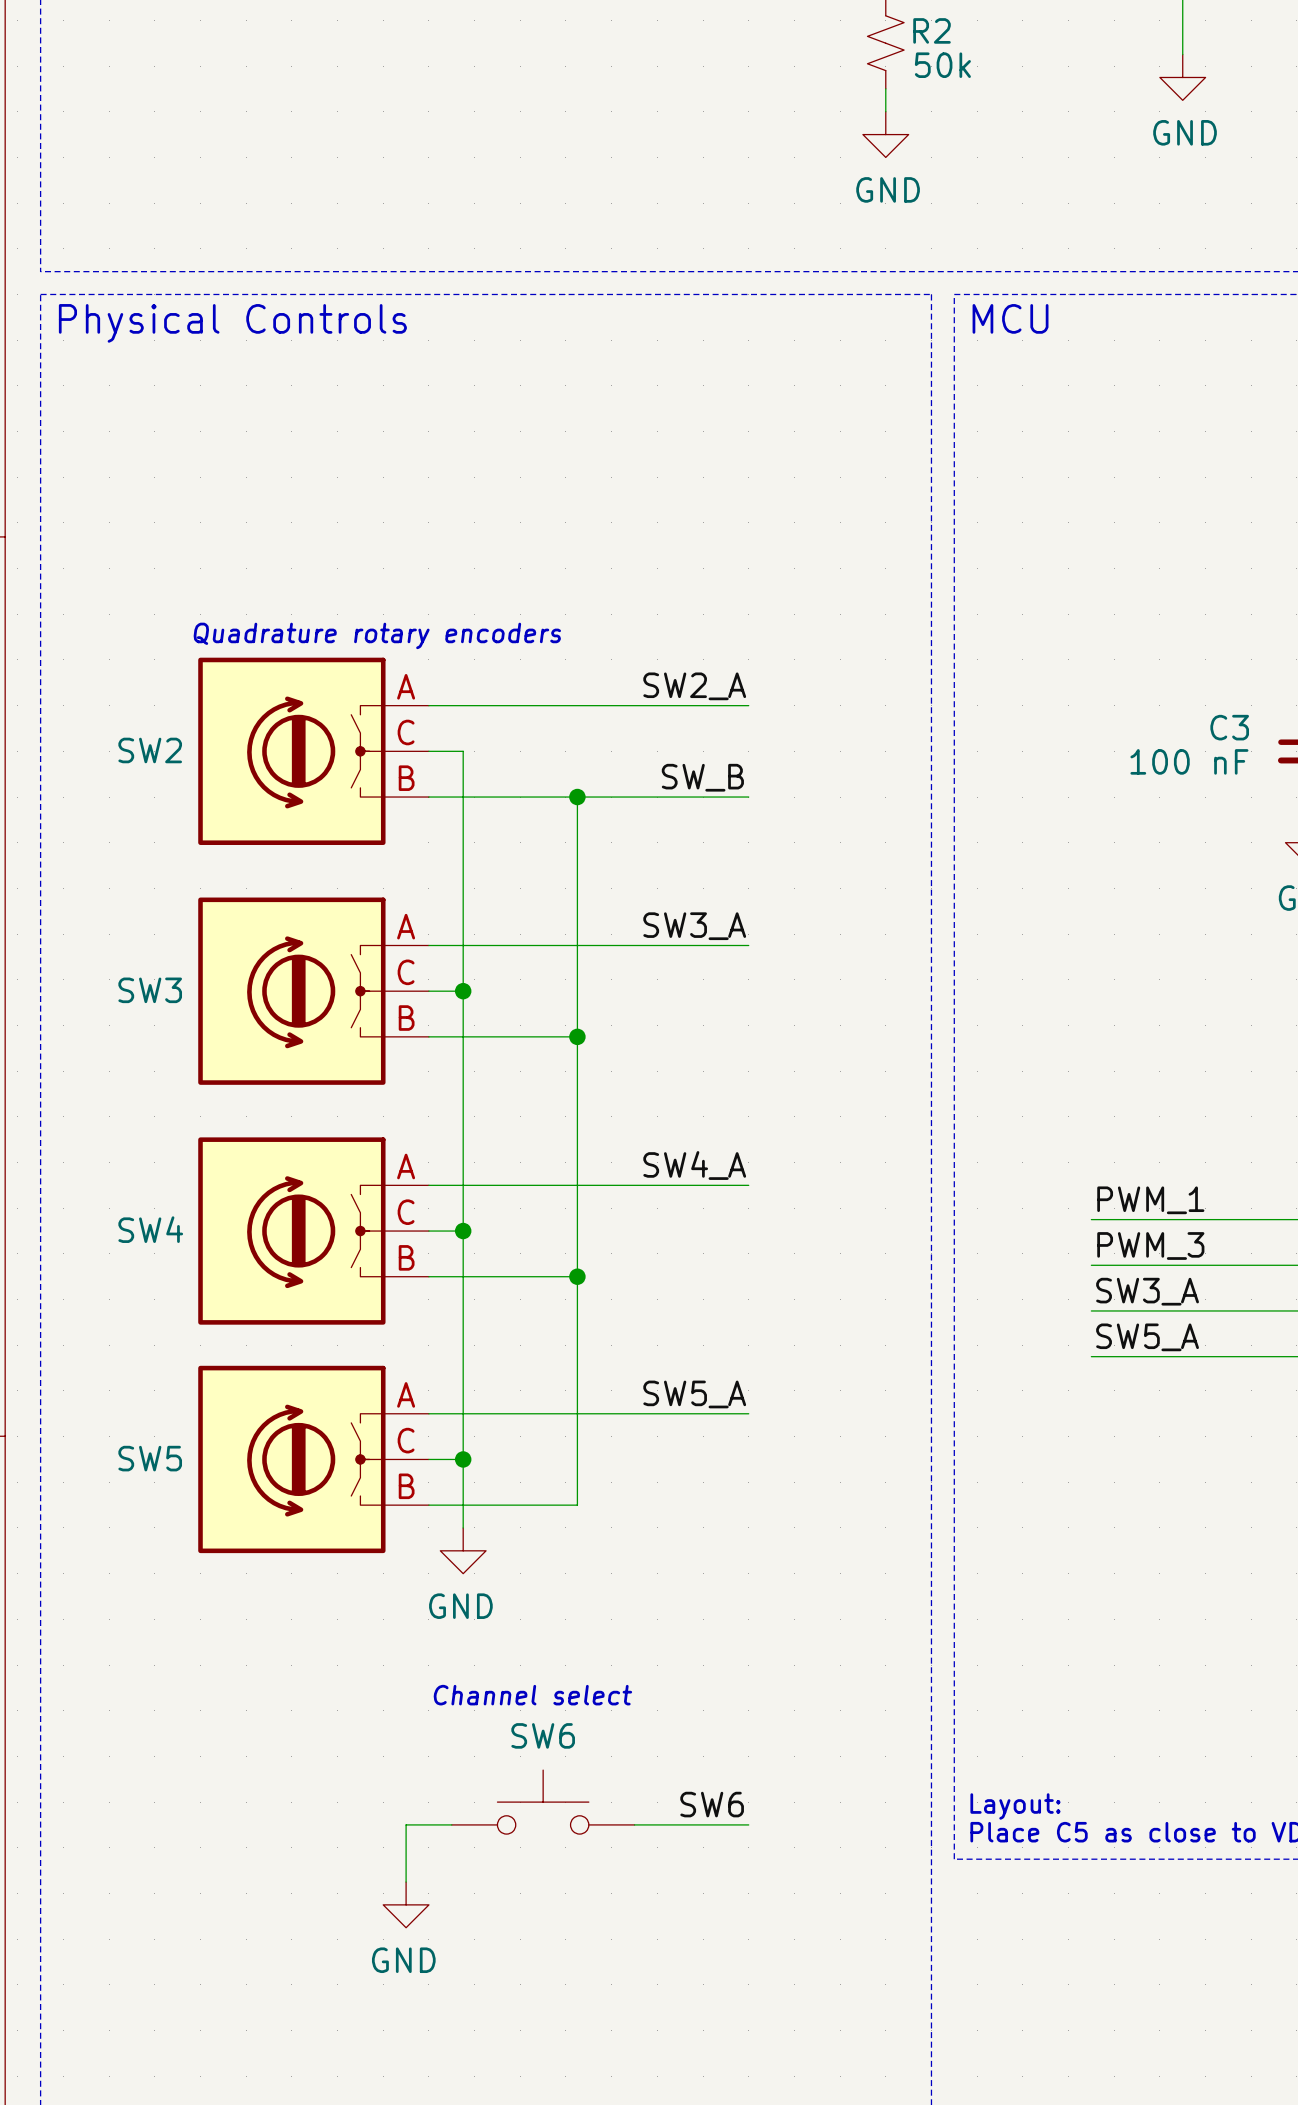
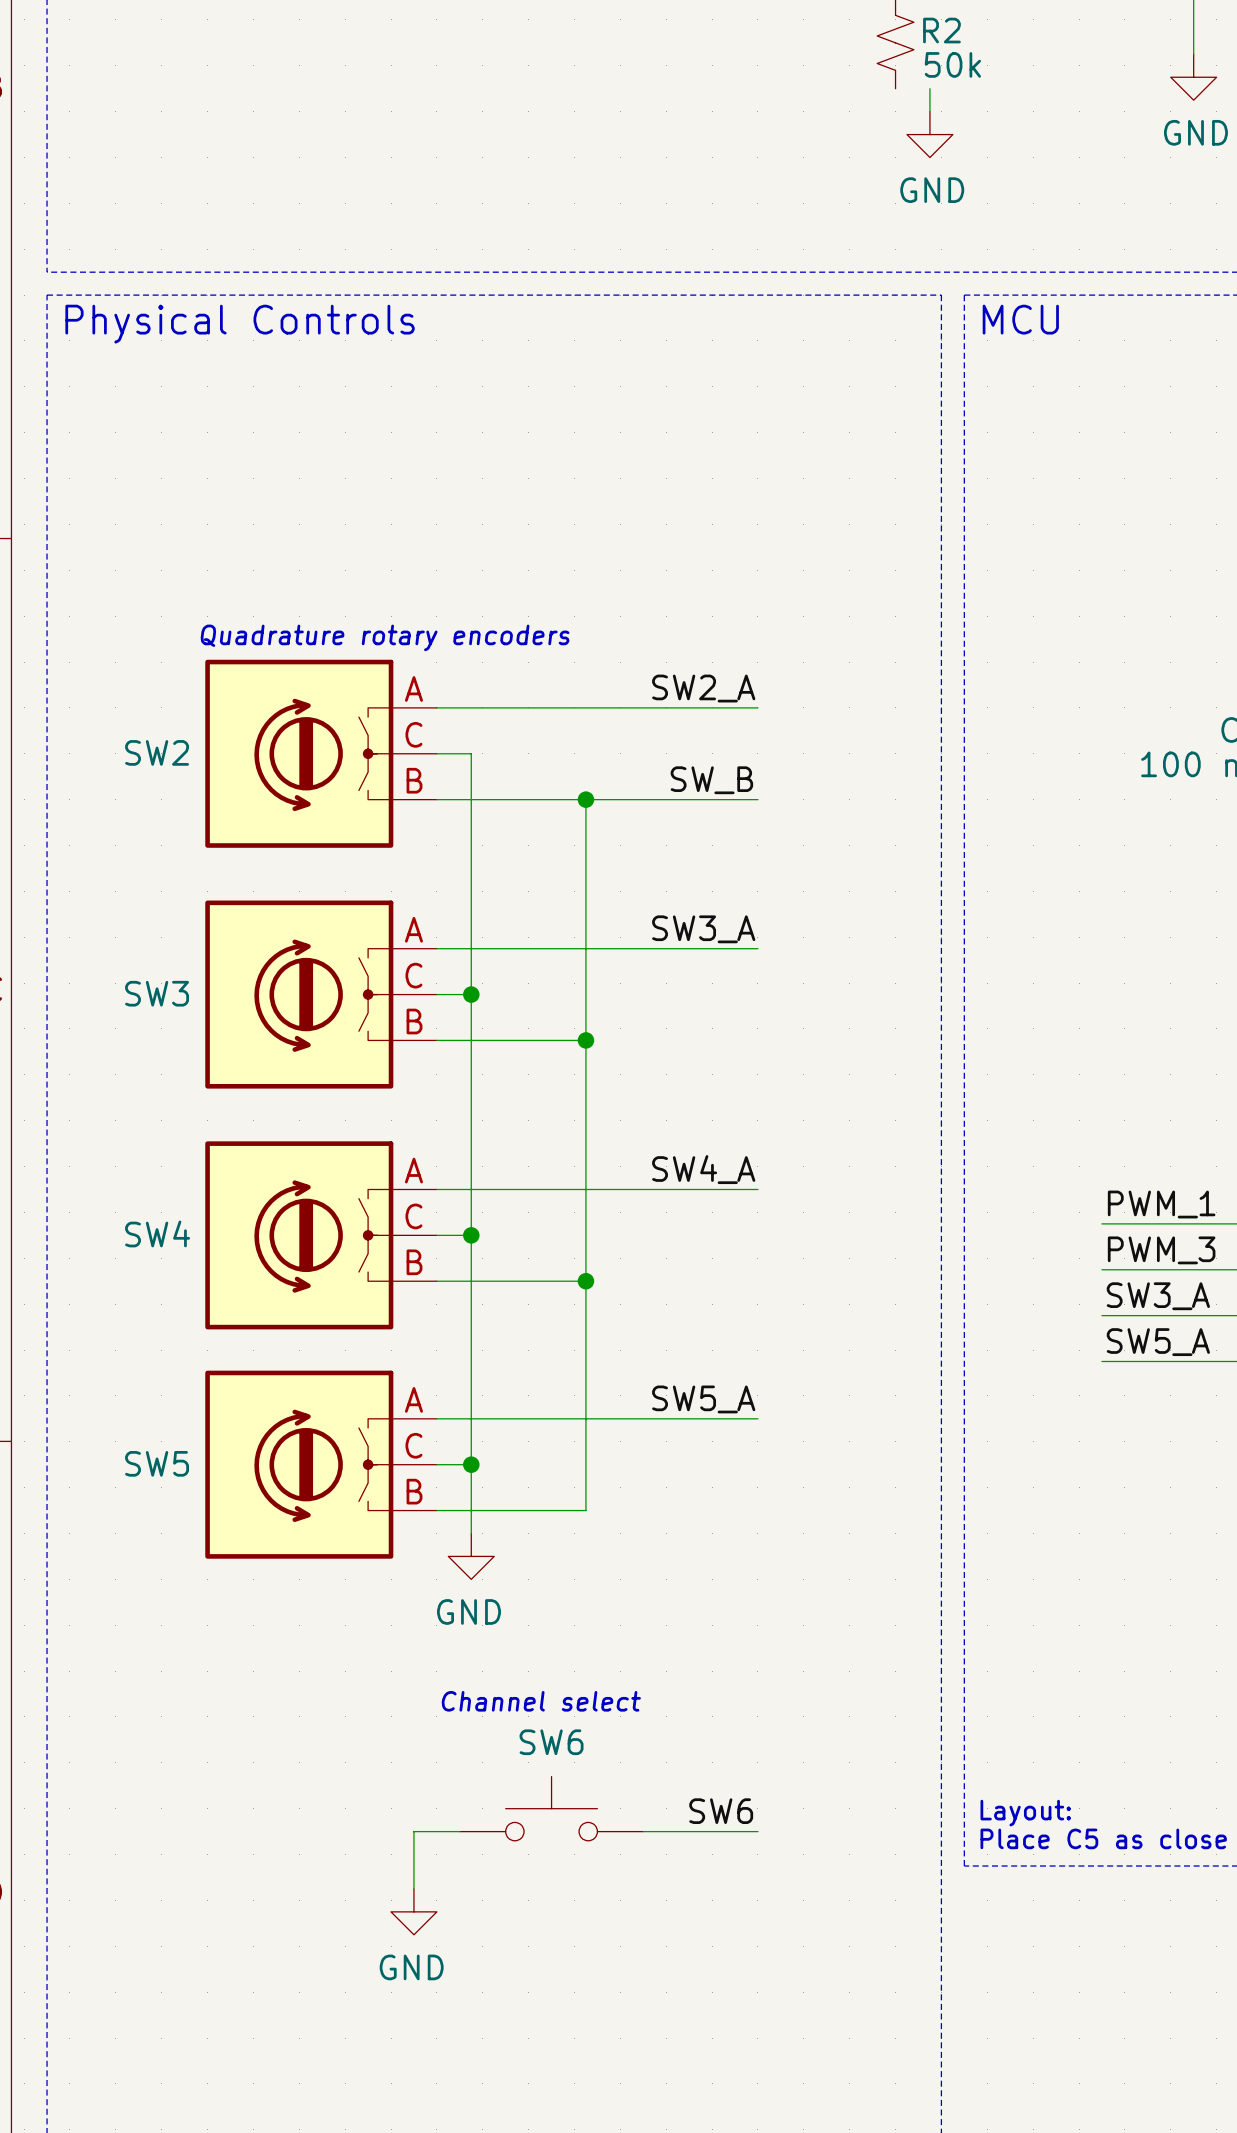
wire: (885, 88) (885, 111) -> (929, 88) (929, 111)
power symbol position: GND (885, 134) -> GND (929, 134)

